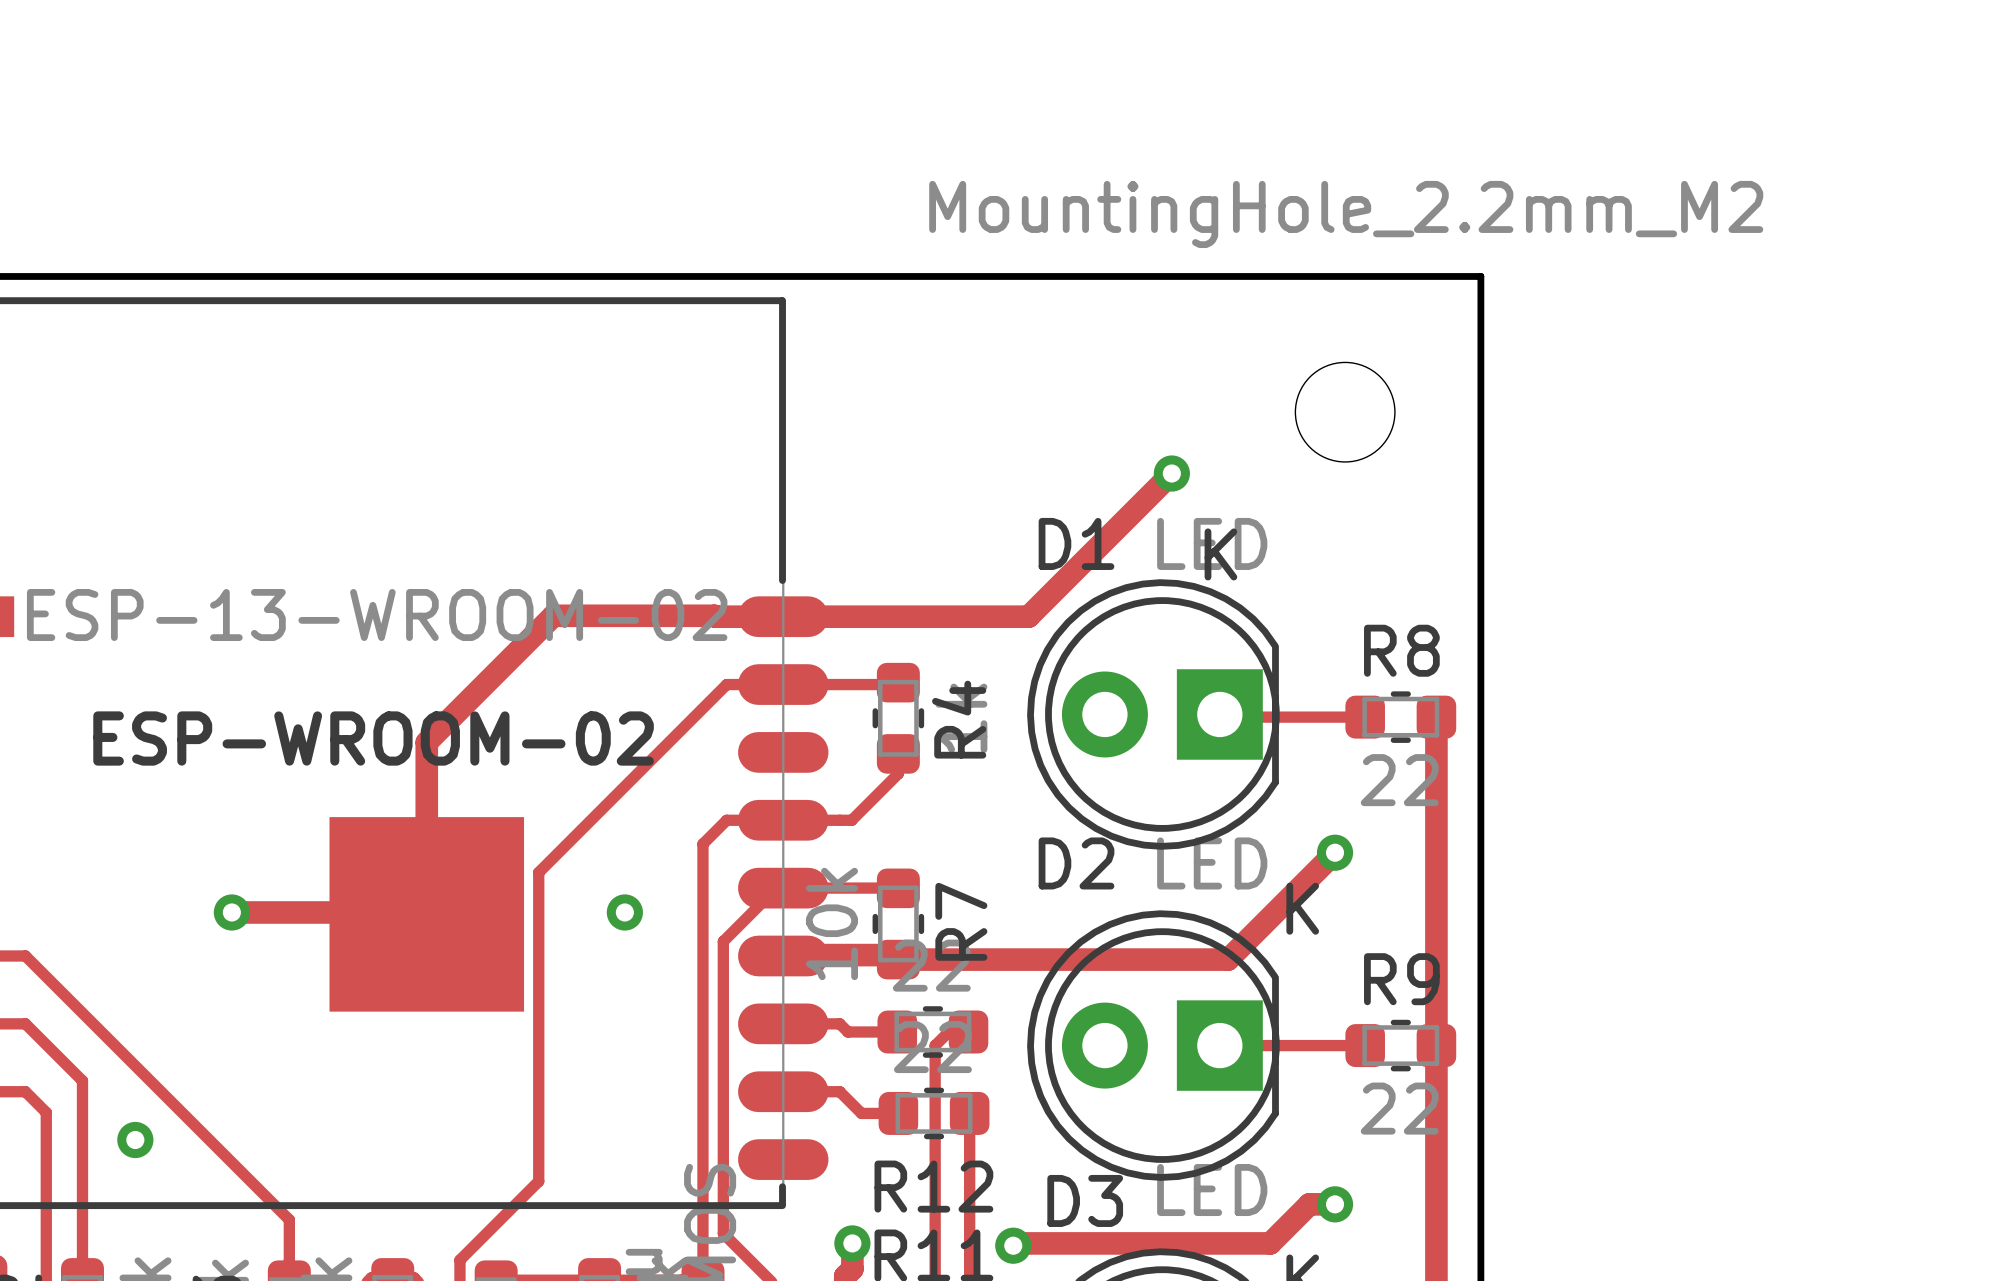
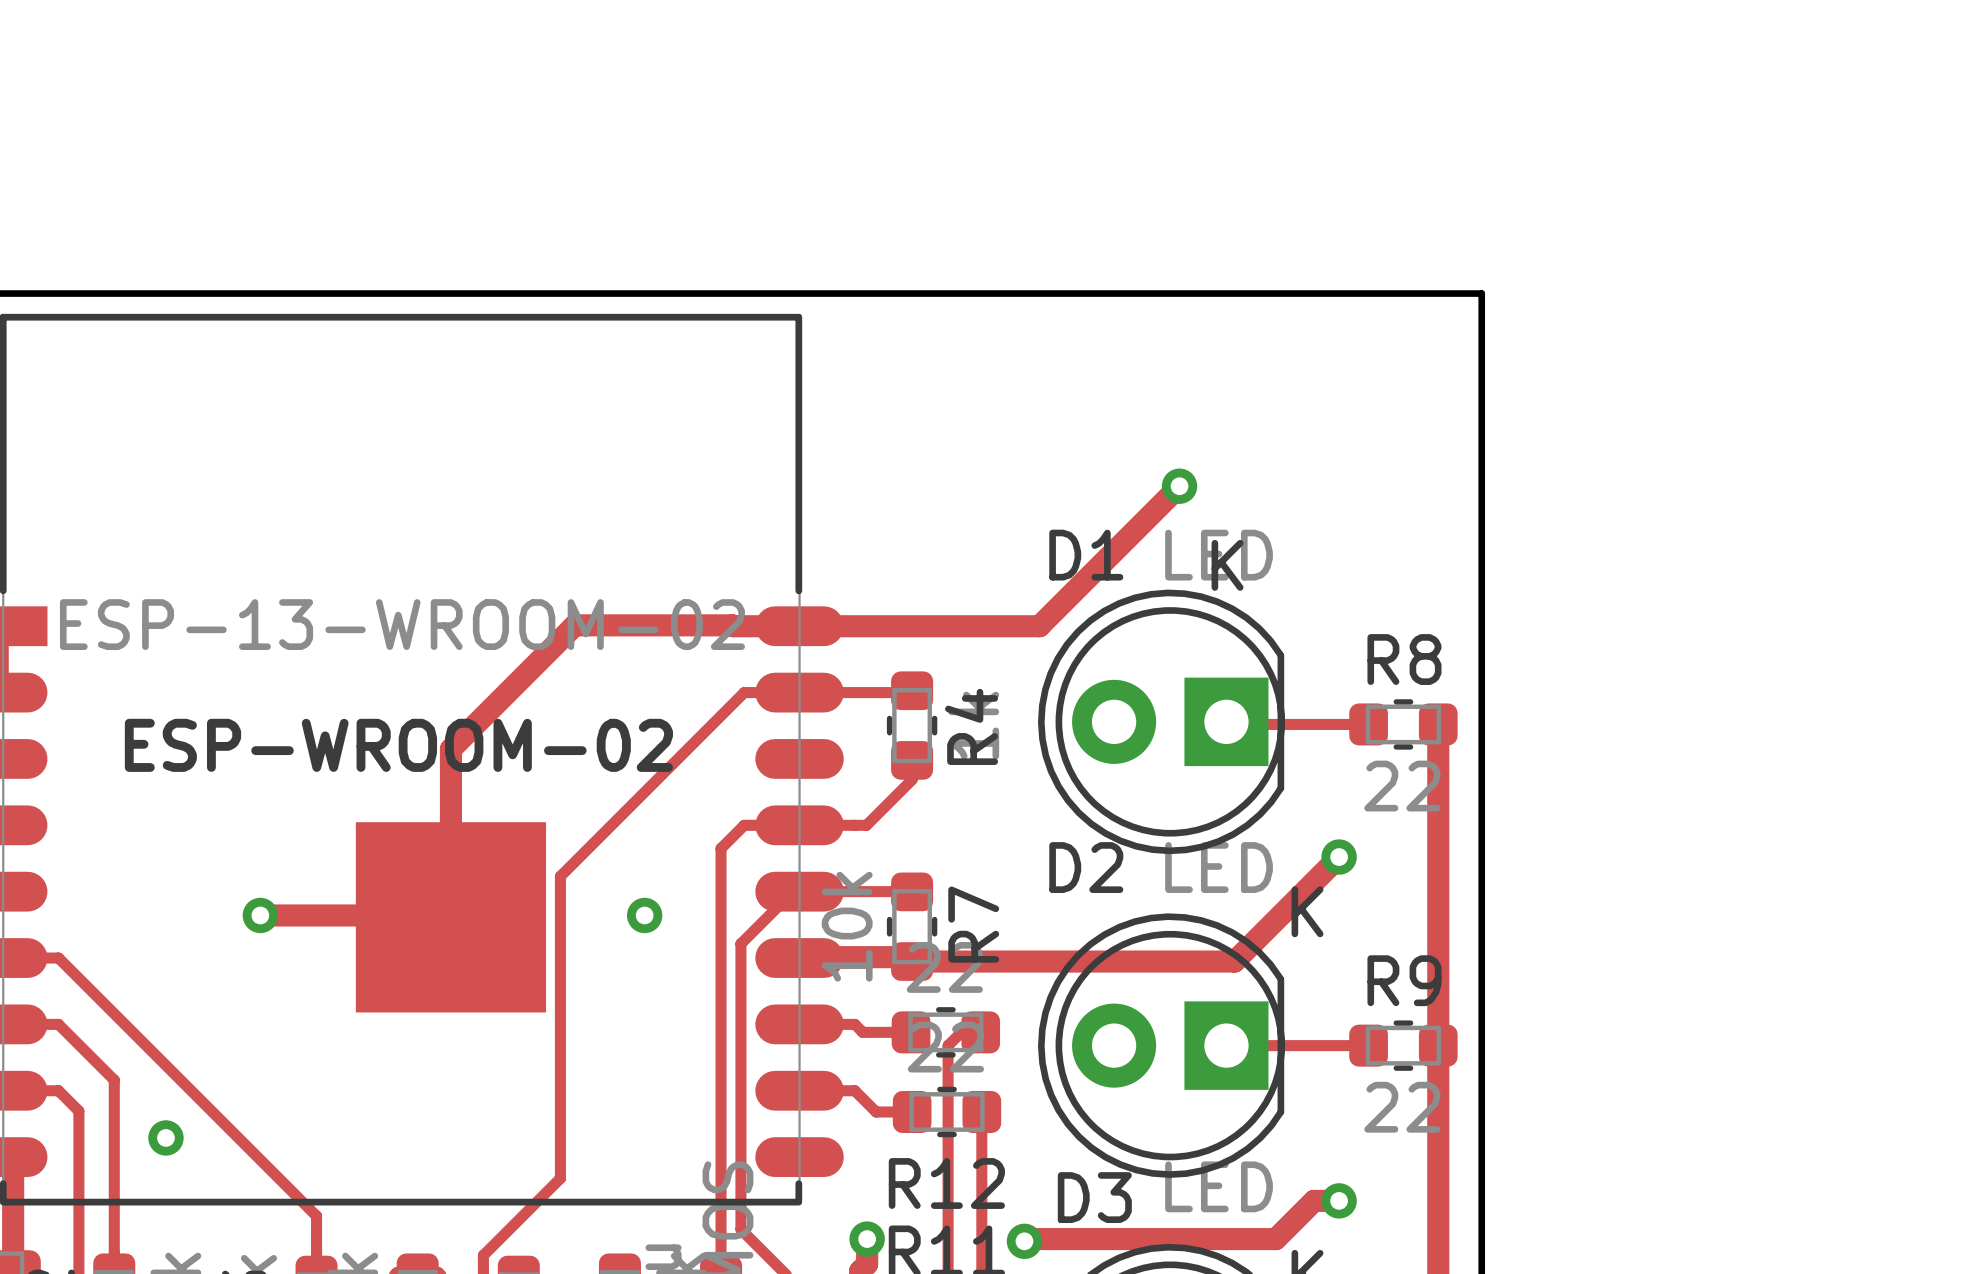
part: MountingHole_2.2mm_M2 (1345, 412) -> none

